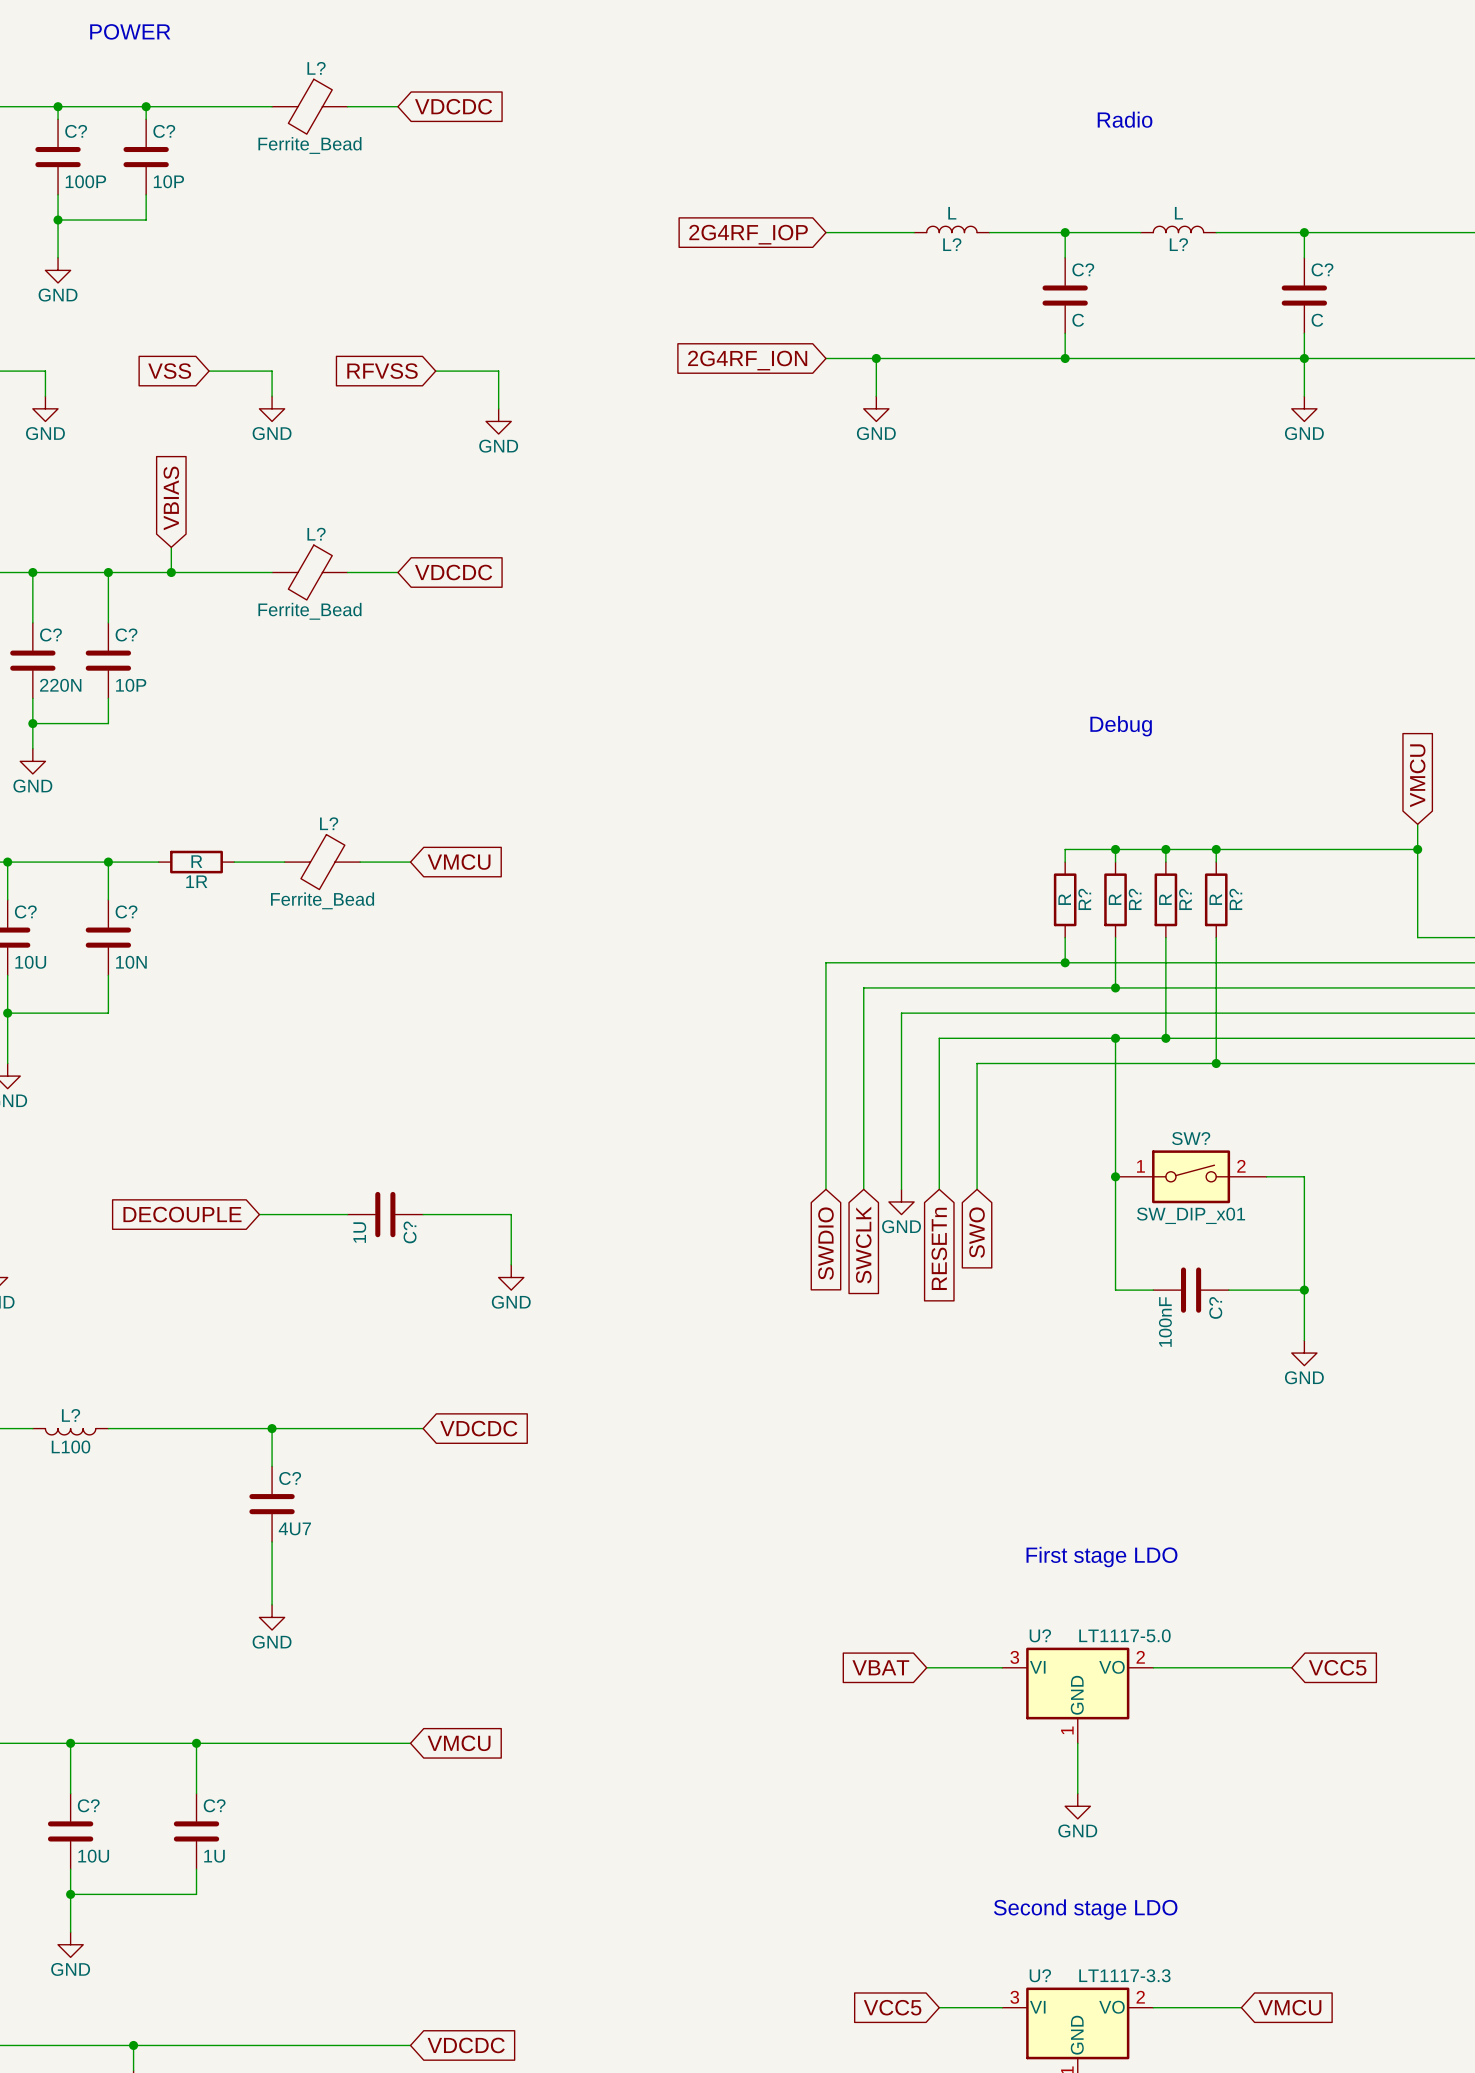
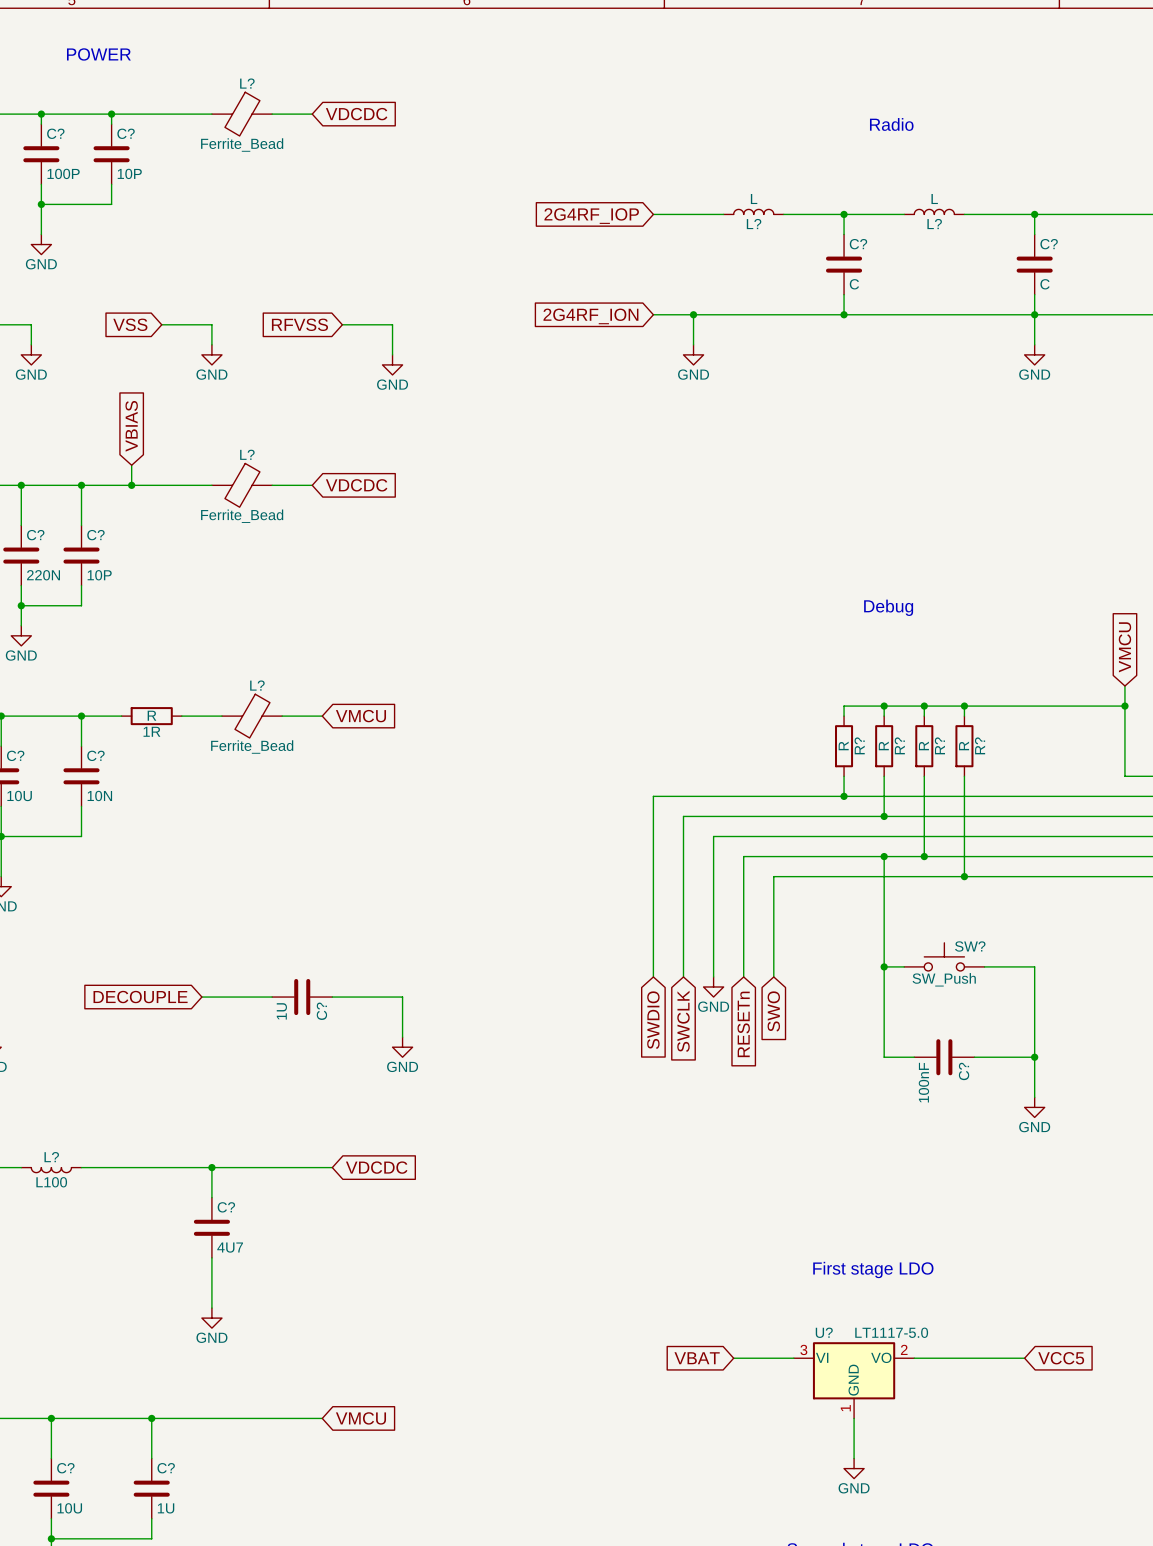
SW?: none -> SW_Push (944, 956)
SW?: SW_DIP_x01 (1191, 1176) -> none

